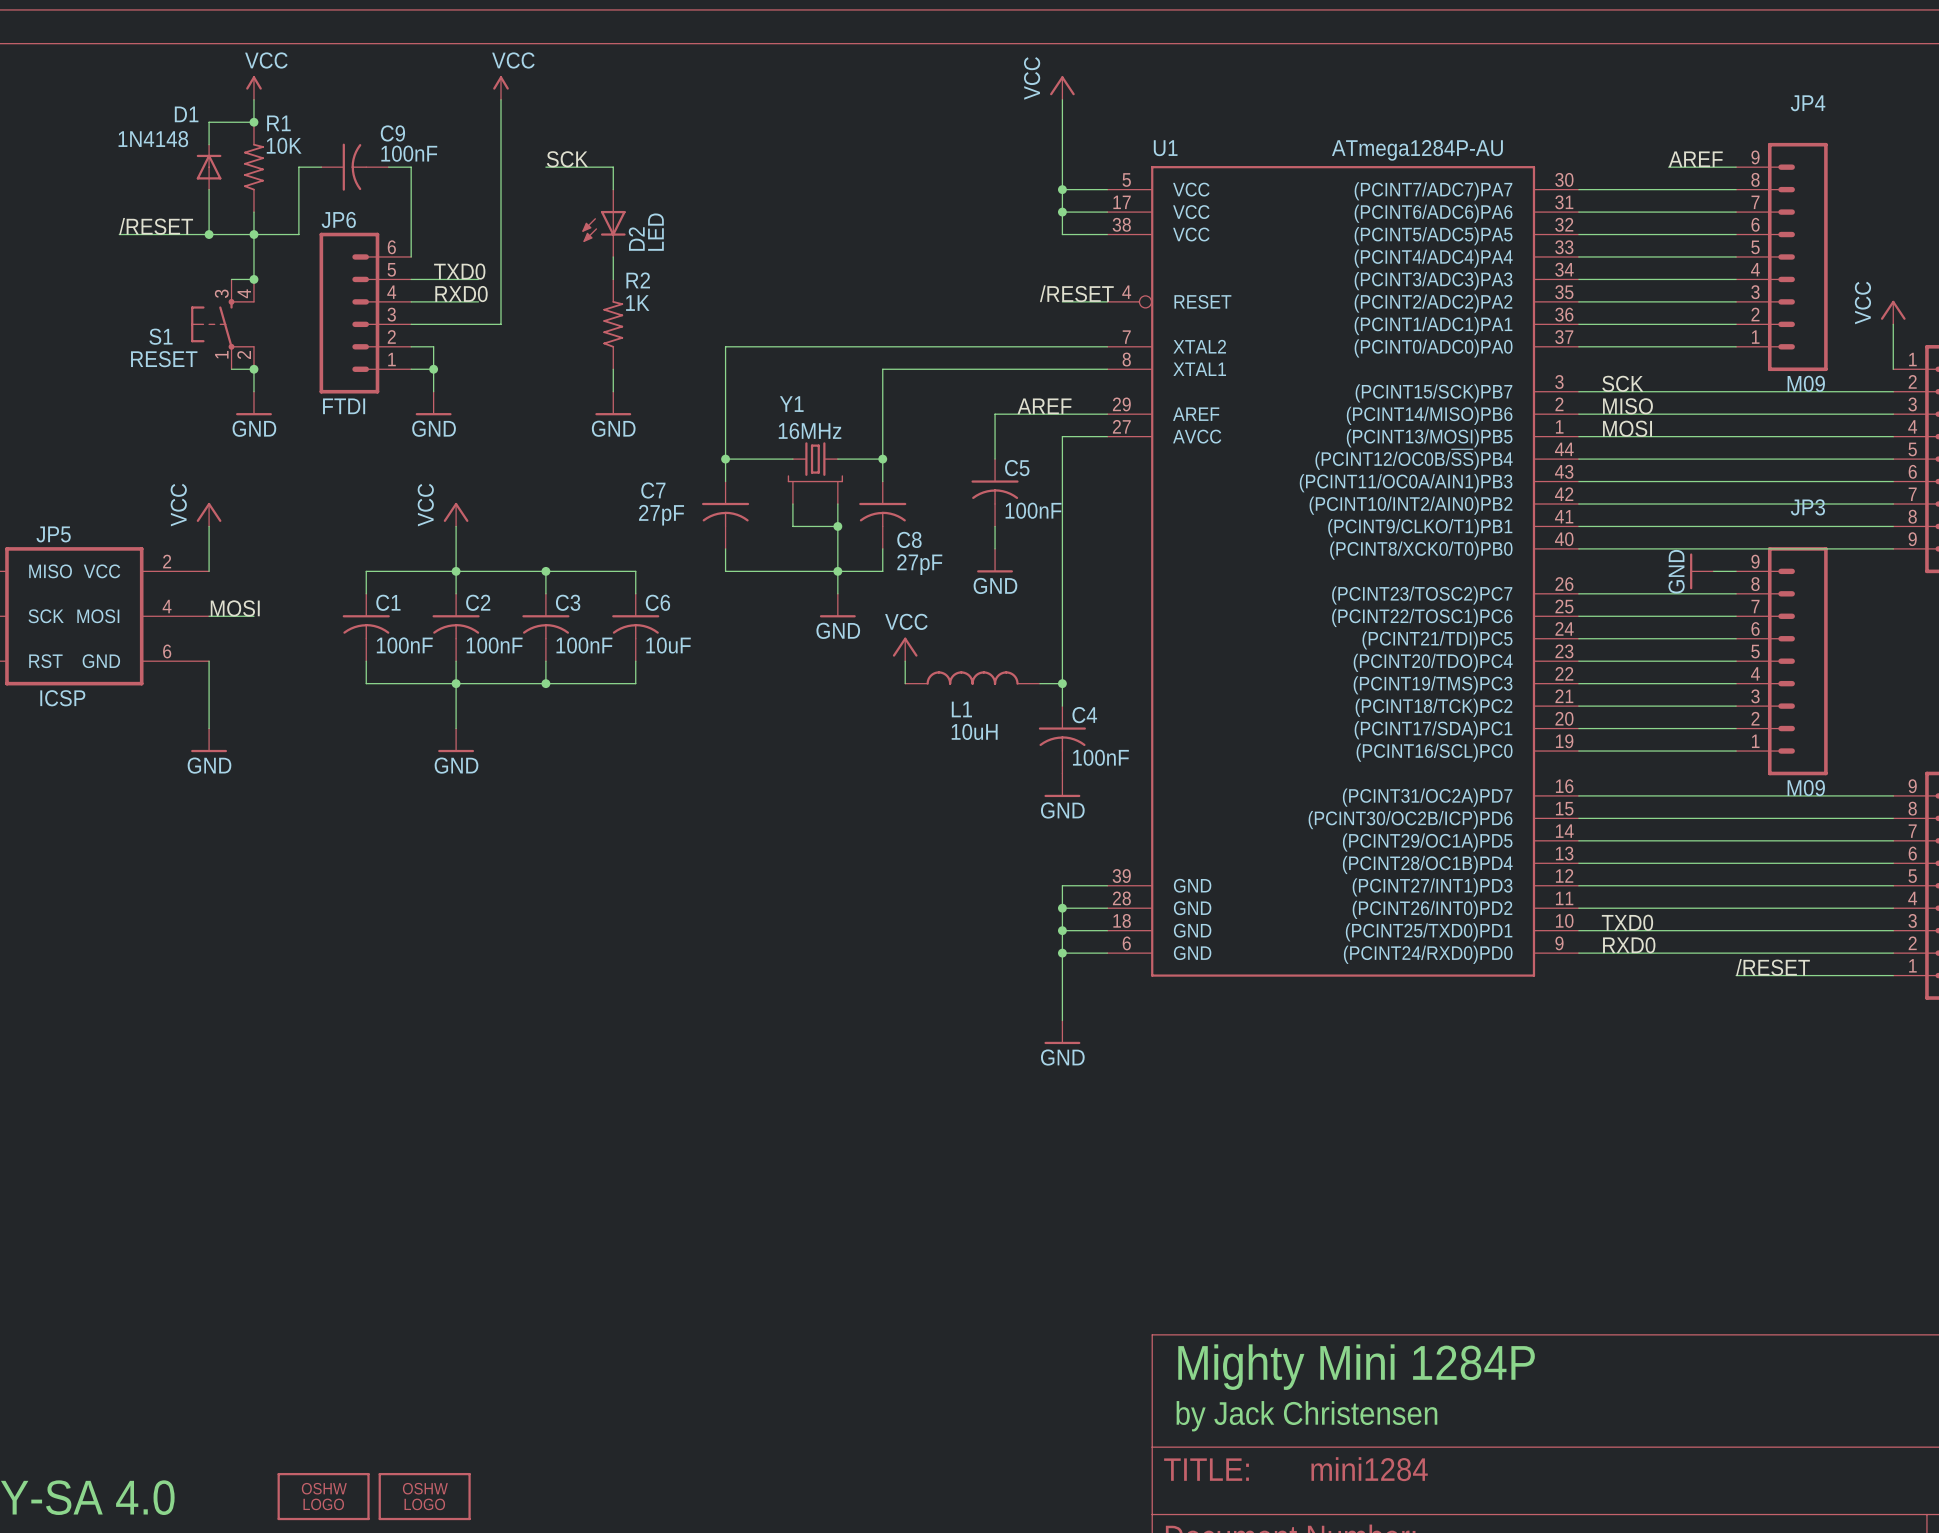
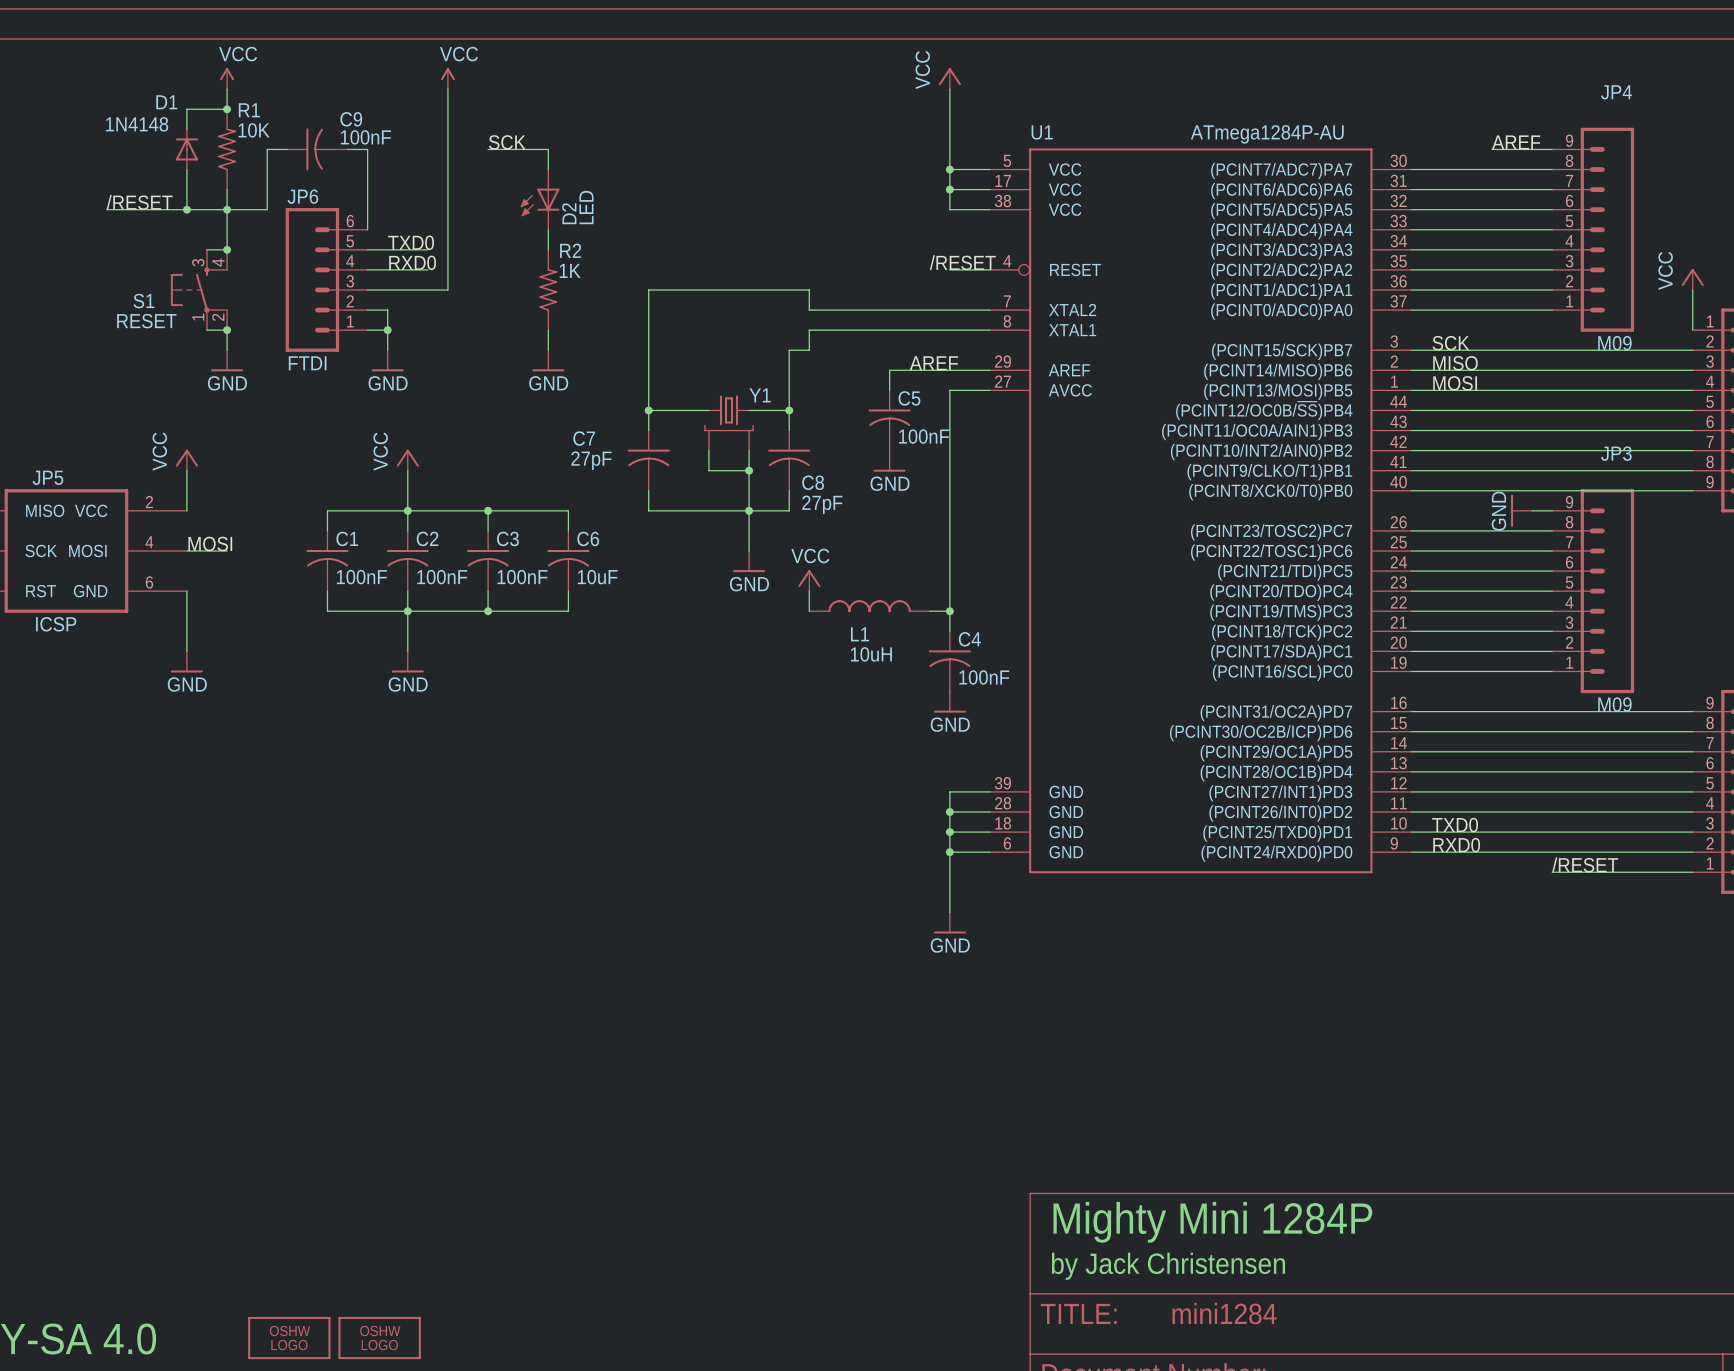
wire: (725, 346) (905, 346) -> (648, 310) (648, 289) (809, 289) (809, 310)
wire: (905, 369) (882, 369) (882, 391) -> (809, 330) (809, 350) (789, 350)
Y1 name position: Y1 (791, 404) -> Y1 (760, 395)
Y1 value: 16MHz (810, 431) -> none
C5 position: (995, 492) -> (889, 420)
power symbol position: GND (995, 560) -> GND (889, 461)
power symbol position: GND (837, 605) -> GND (749, 561)

